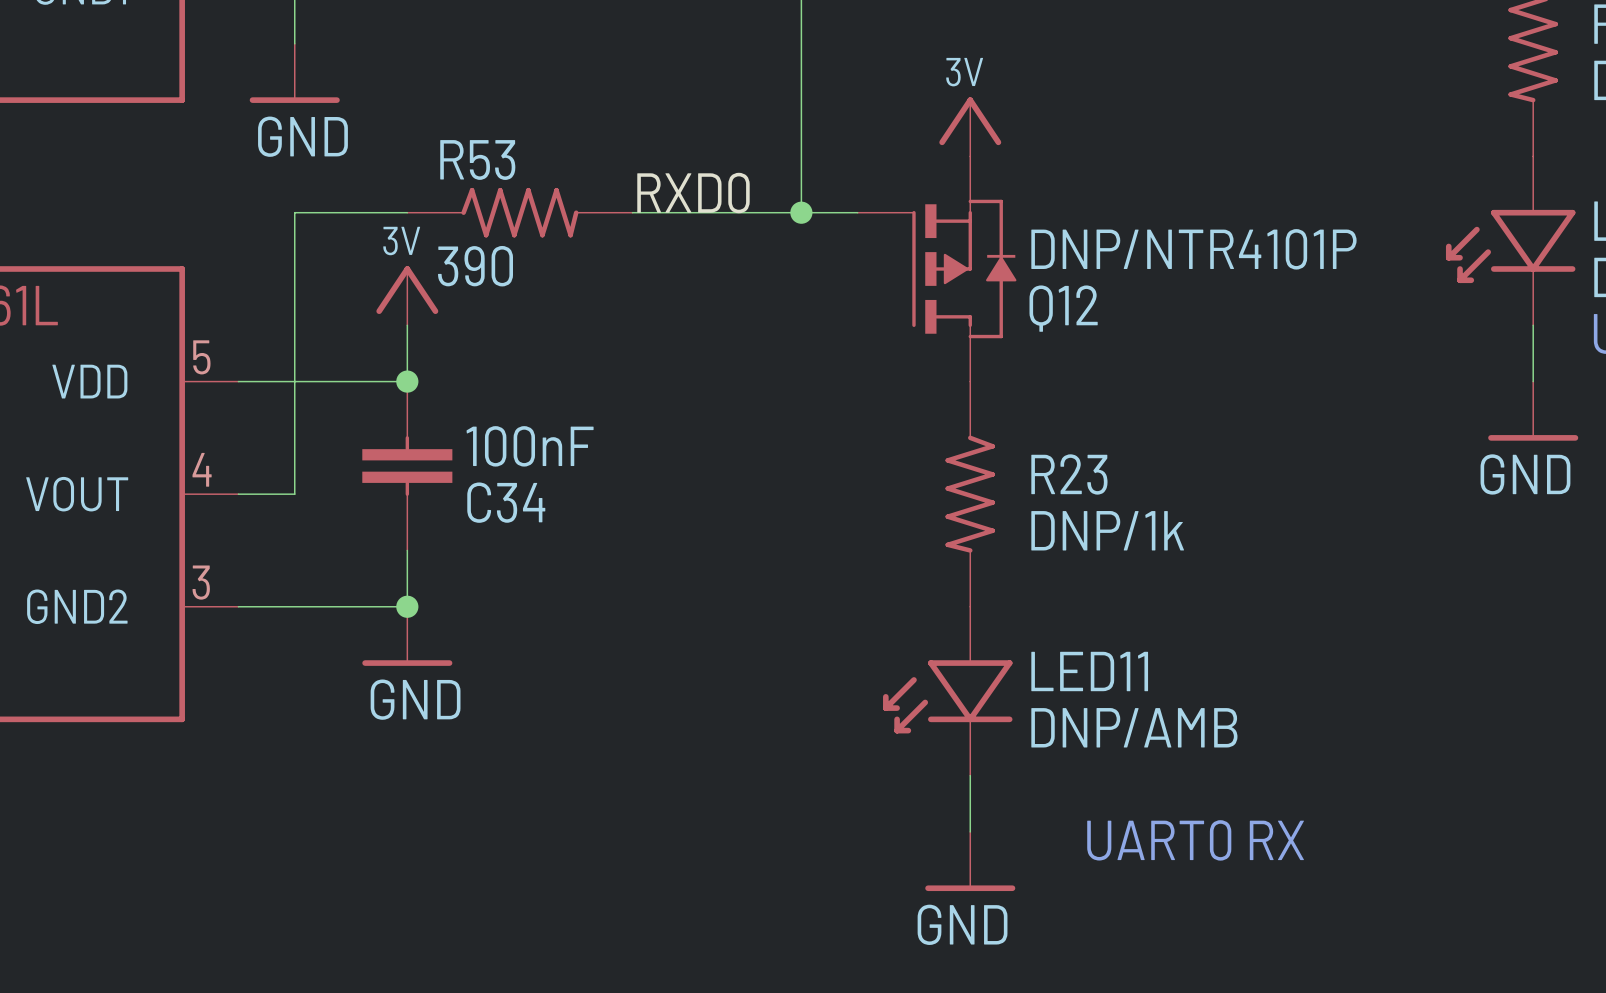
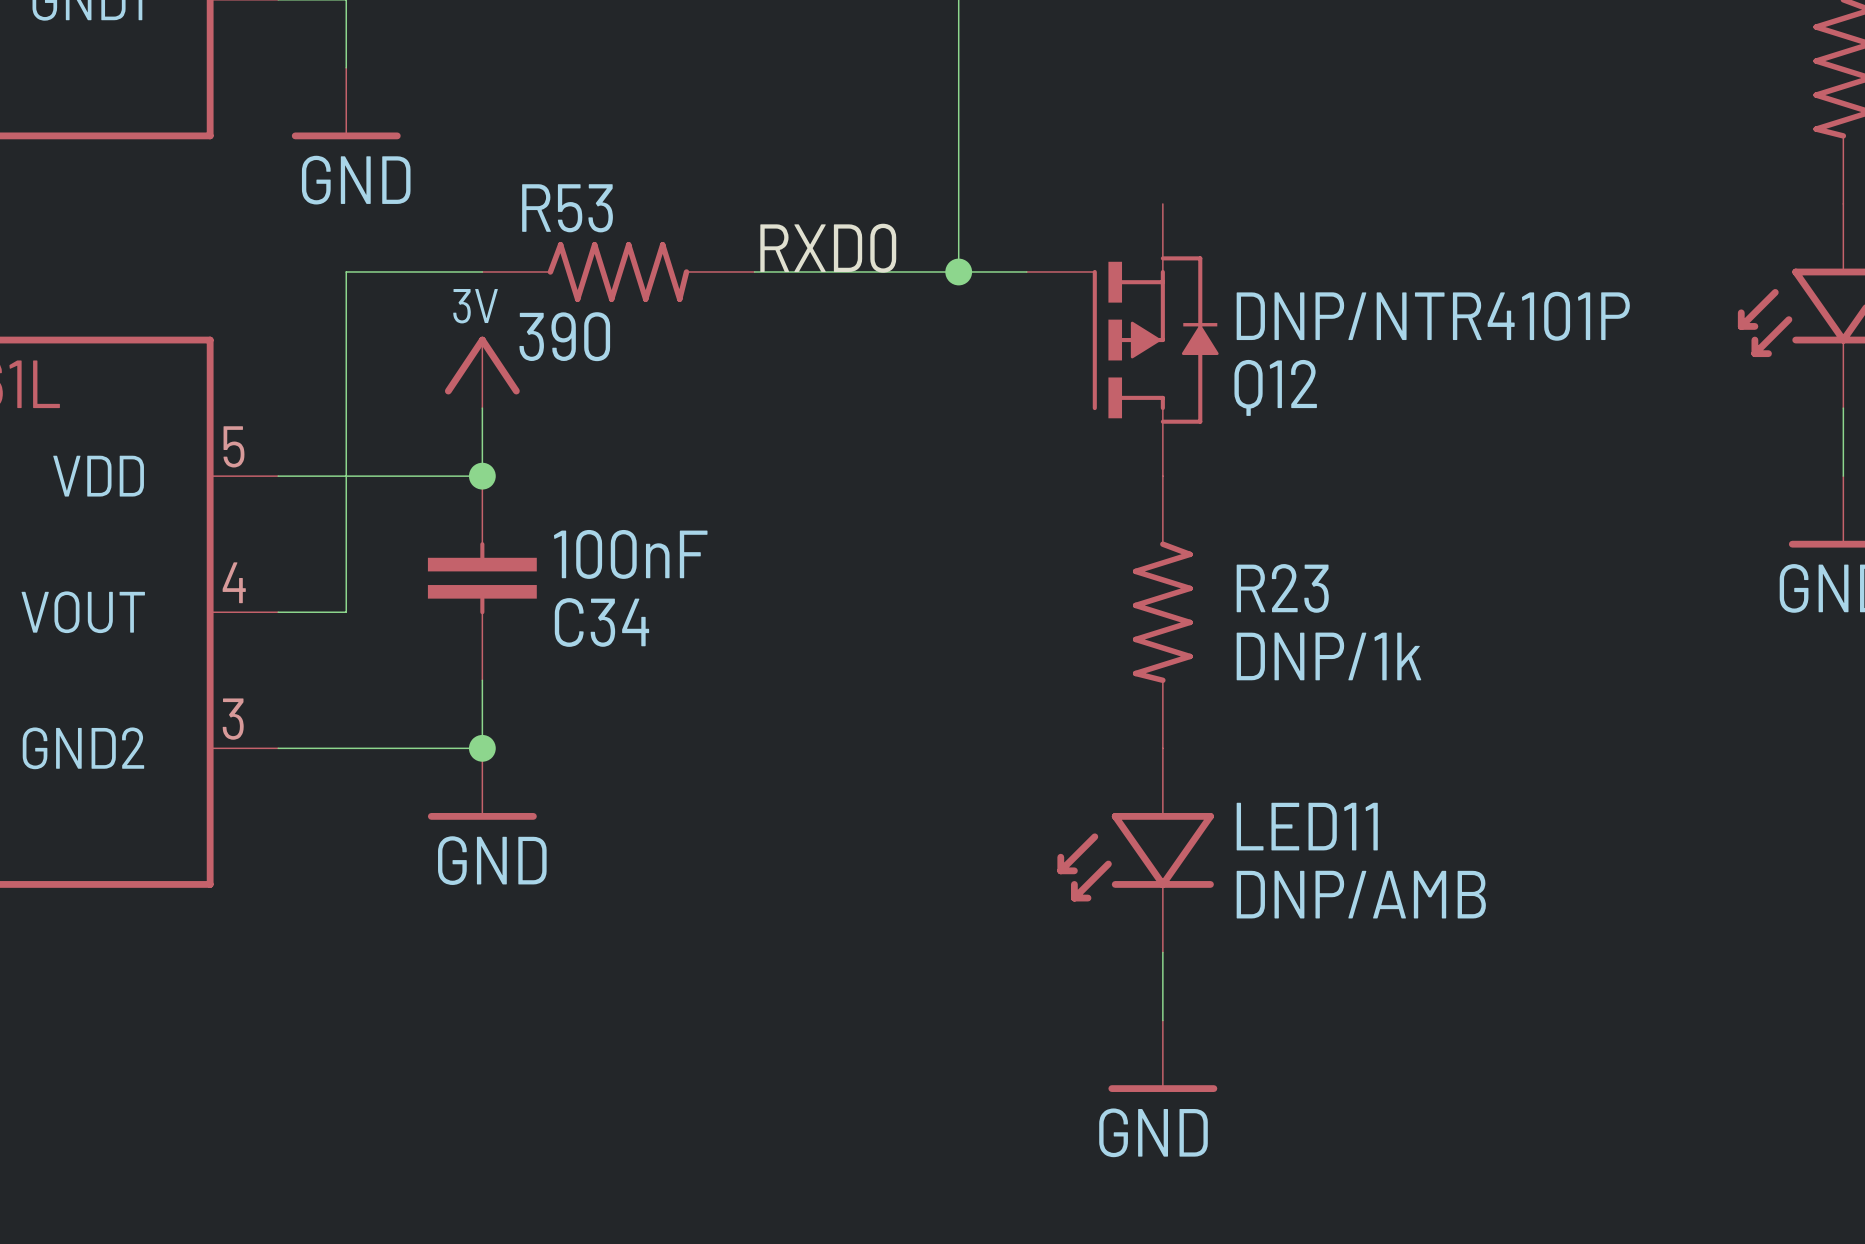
power symbol: 3V (970, 126) -> none
text: UART0 RX (1195, 840) -> none

